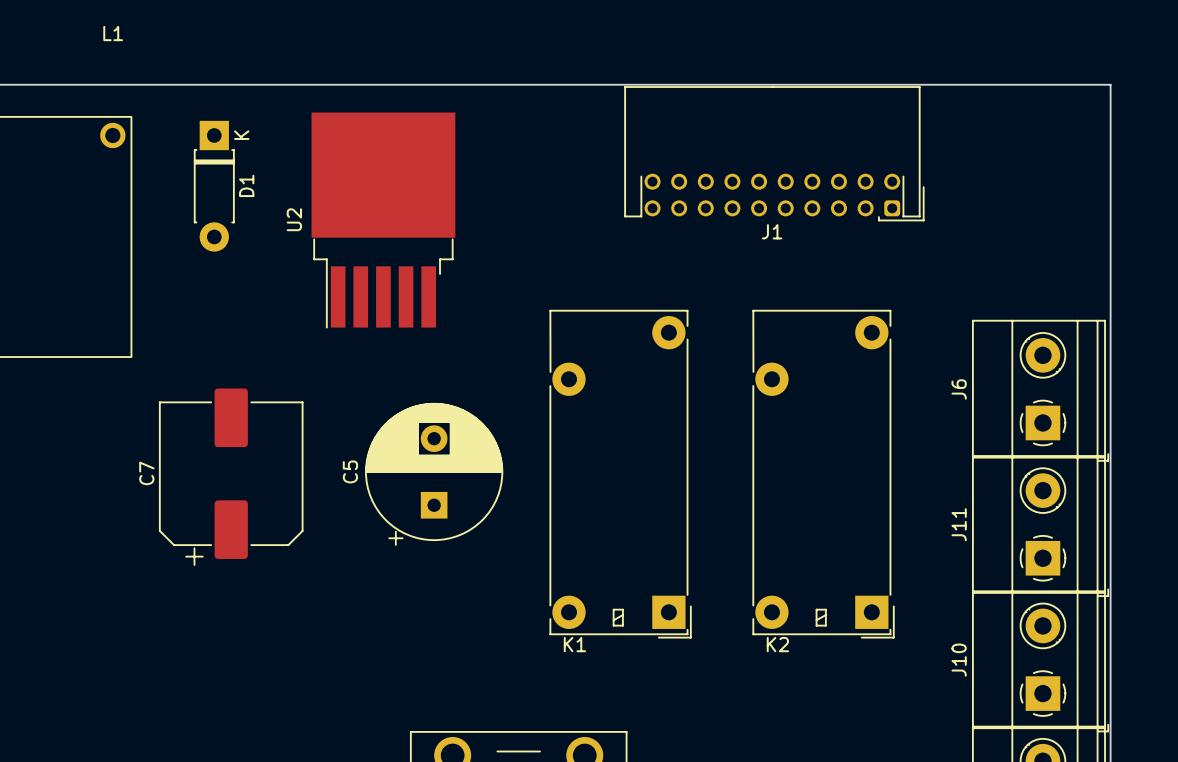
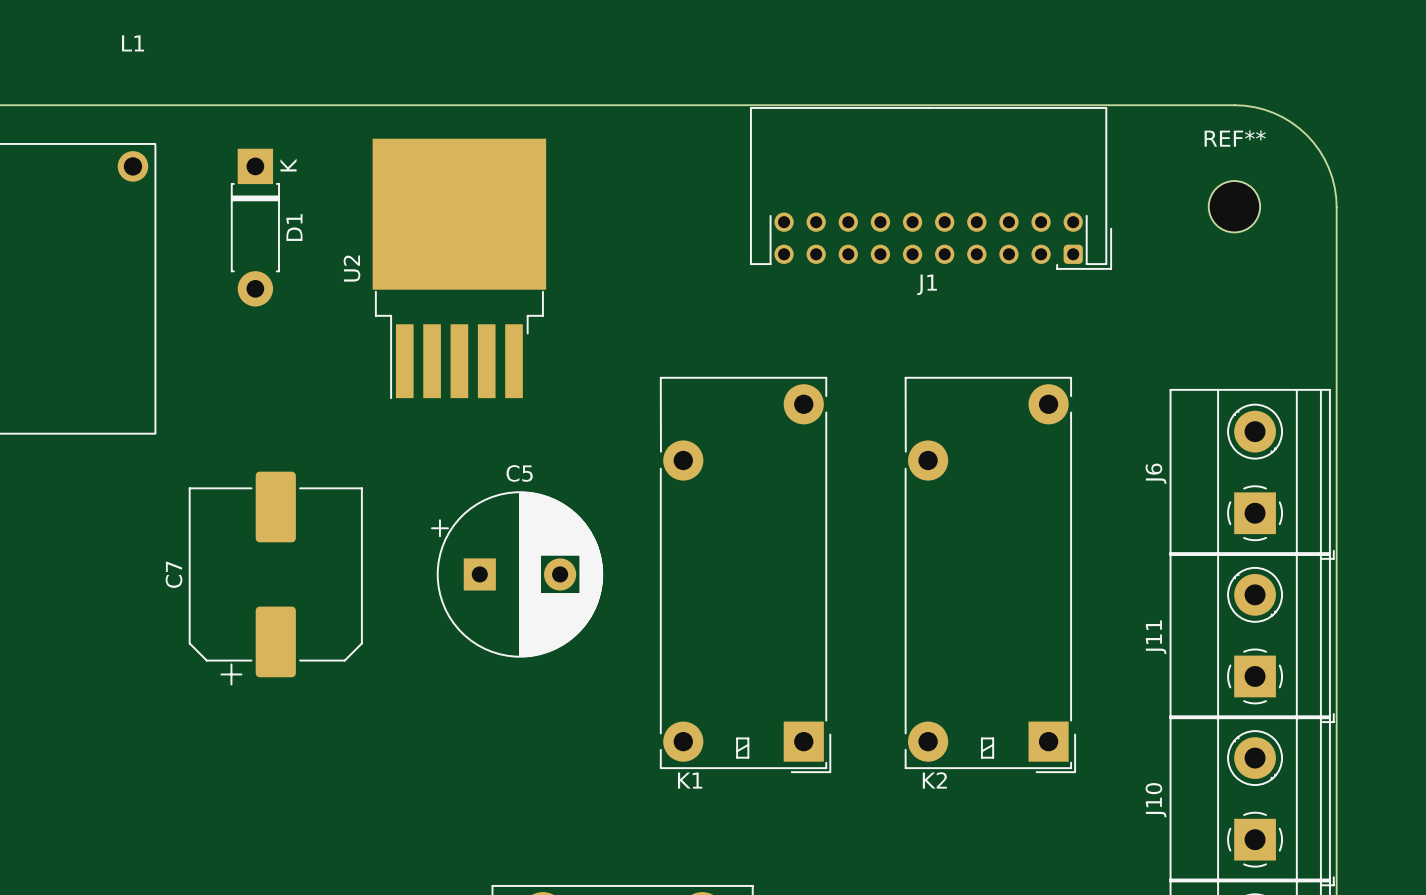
board edge: (1026, 84) (1110, 84) (1110, 169) -> (1234, 105) (1254, 107) (1273, 112) (1291, 122) (1306, 135) (1319, 150) (1328, 168) (1334, 187) (1336, 207)
REF**: none -> (1234, 206)
C5 rotation: 0° (434, 474) -> 90° clockwise (517, 574)

